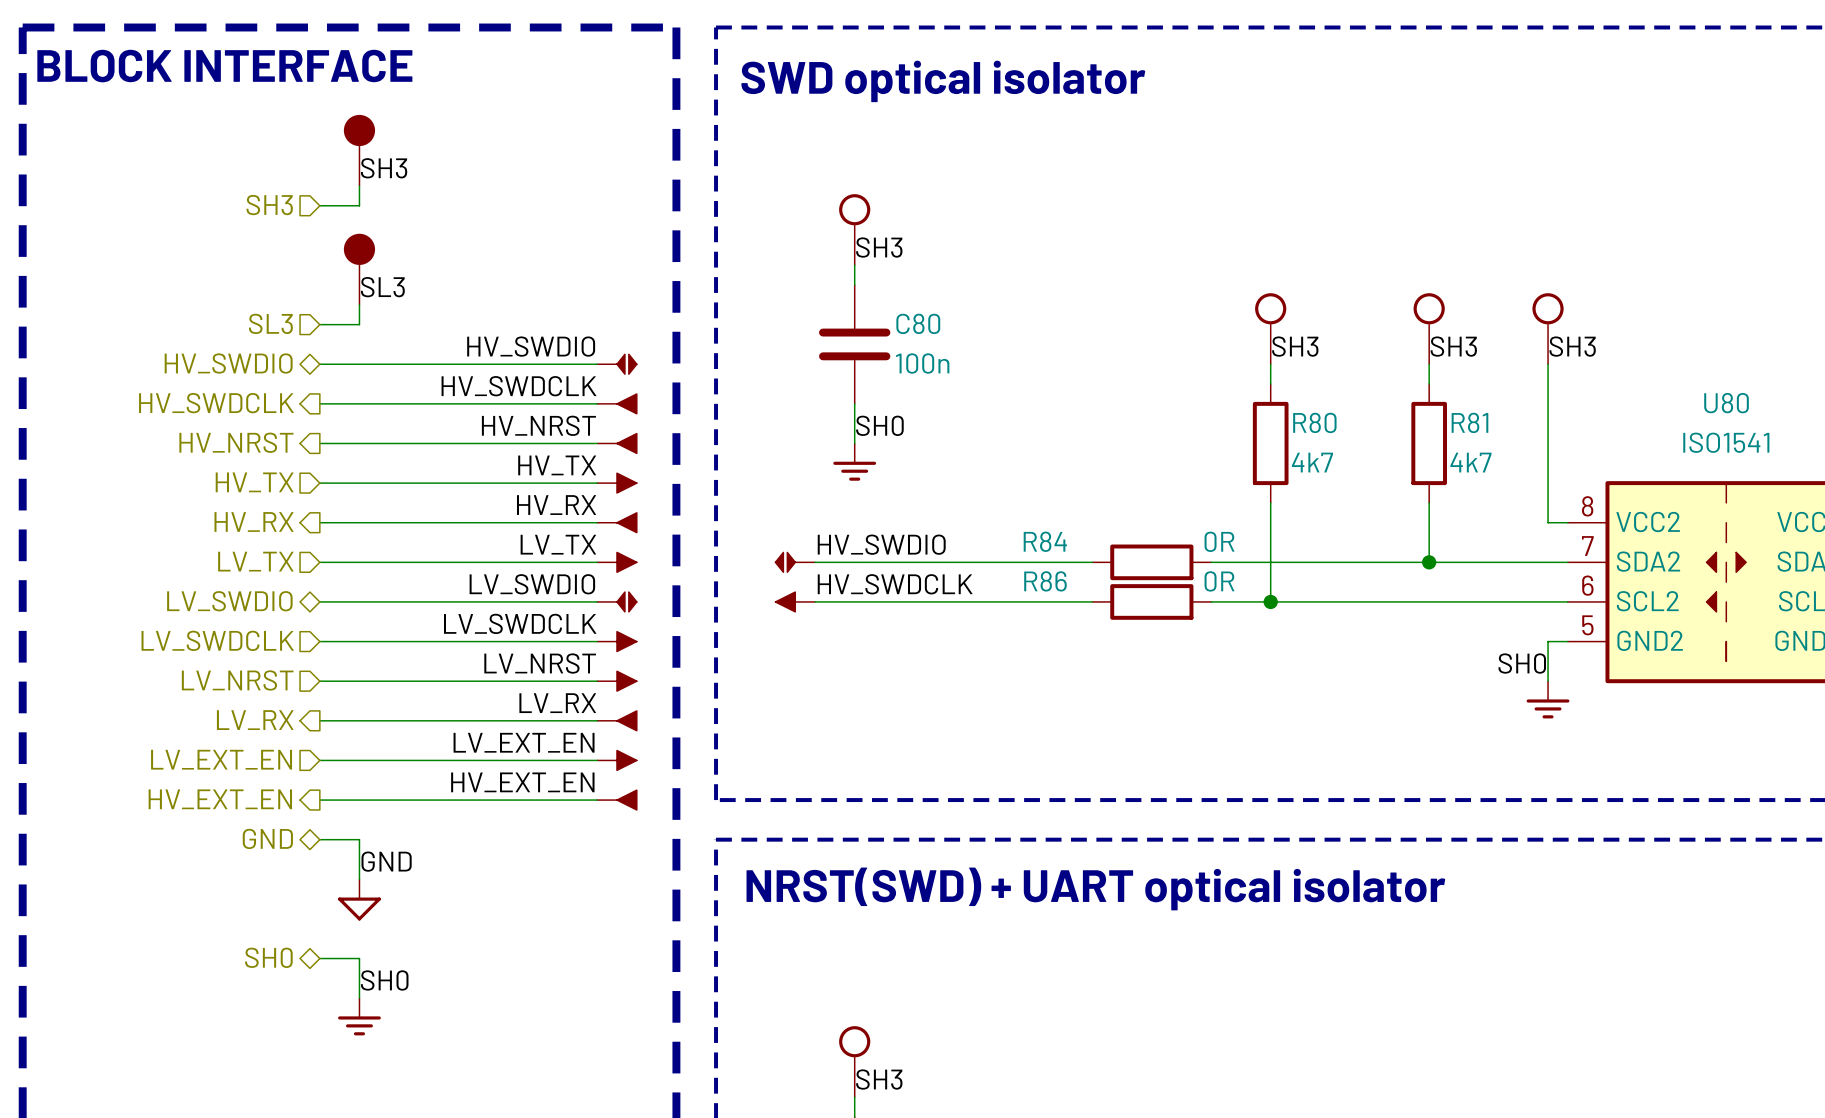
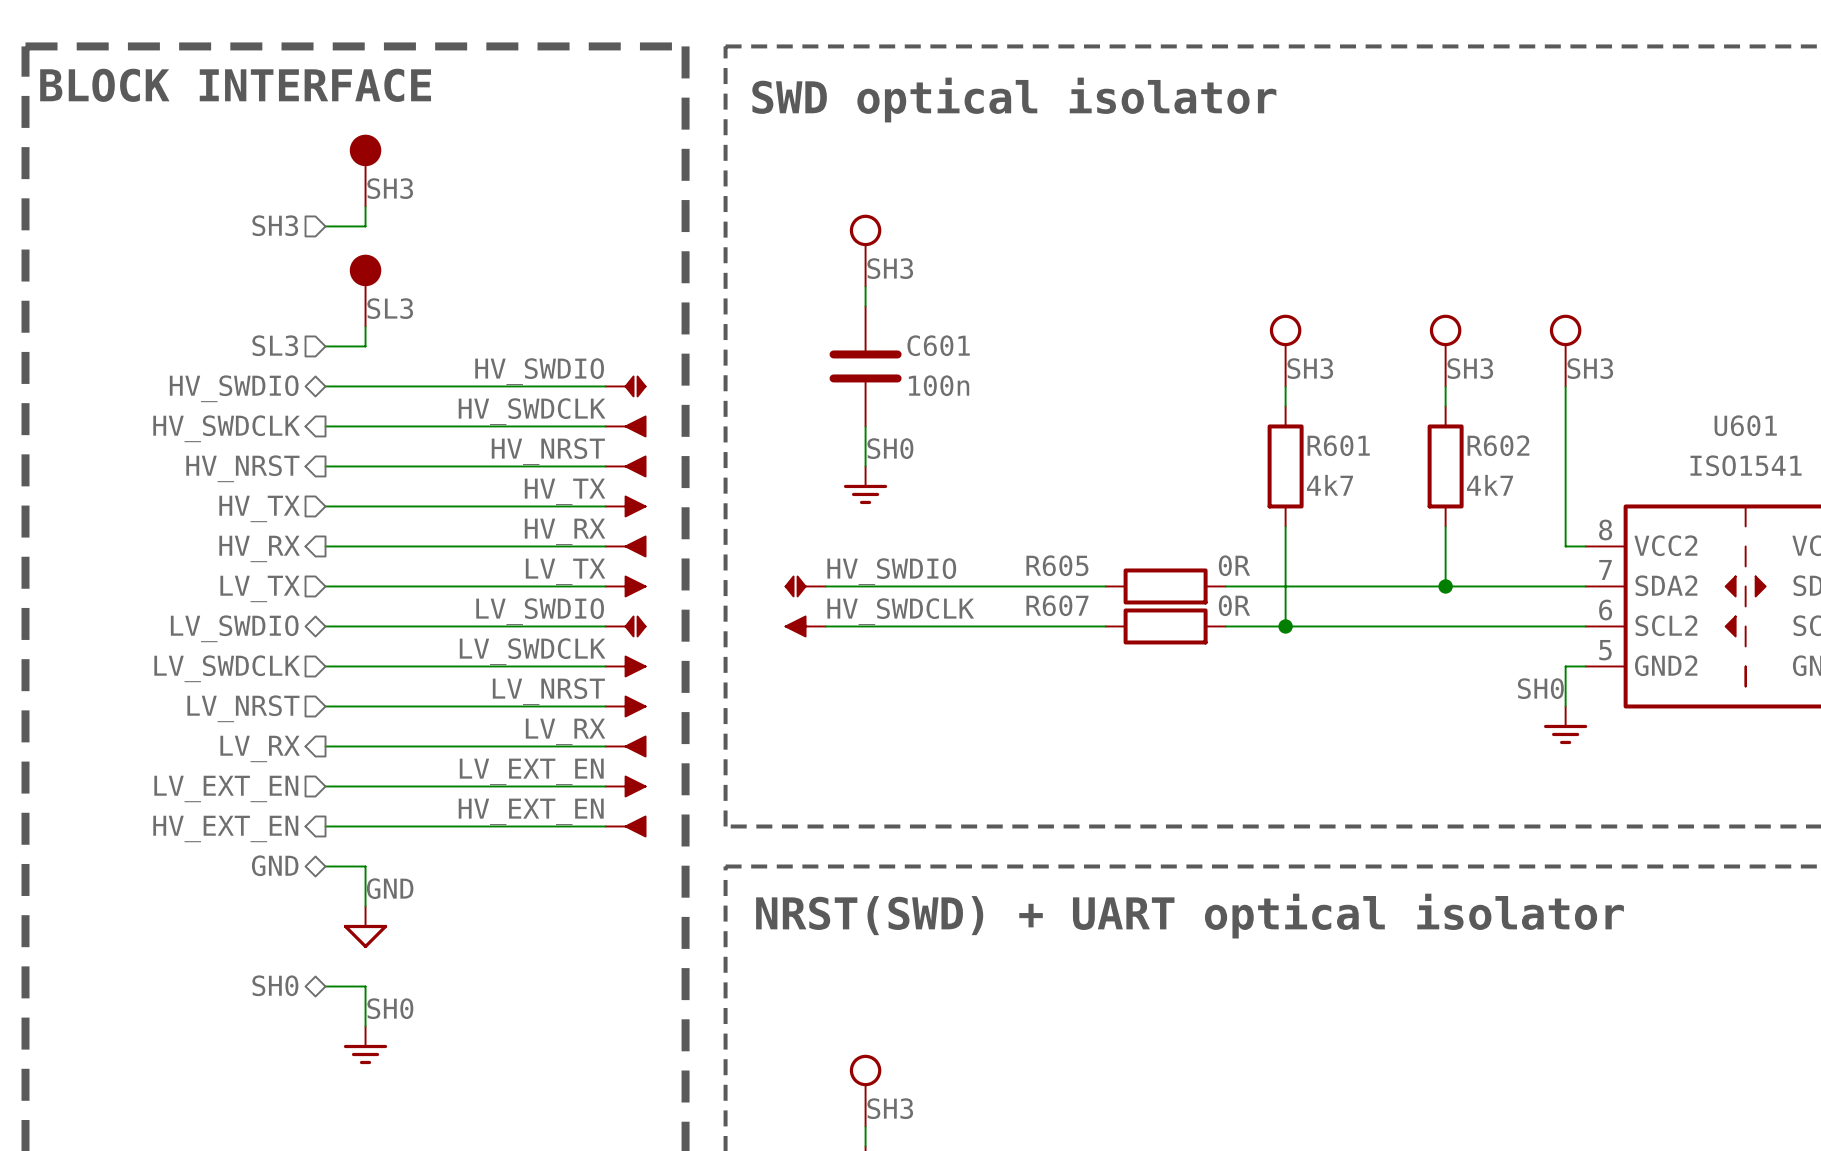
C80 name: C80 (918, 323) -> C601 (938, 345)
U80 name: U80 (1726, 403) -> U601 (1745, 425)
R80 name: R80 (1314, 422) -> R601 (1338, 445)
R81 name: R81 (1469, 422) -> R602 (1498, 445)
R84 name: R84 (1045, 541) -> R605 (1057, 565)
R86 name: R86 (1045, 581) -> R607 (1057, 605)

